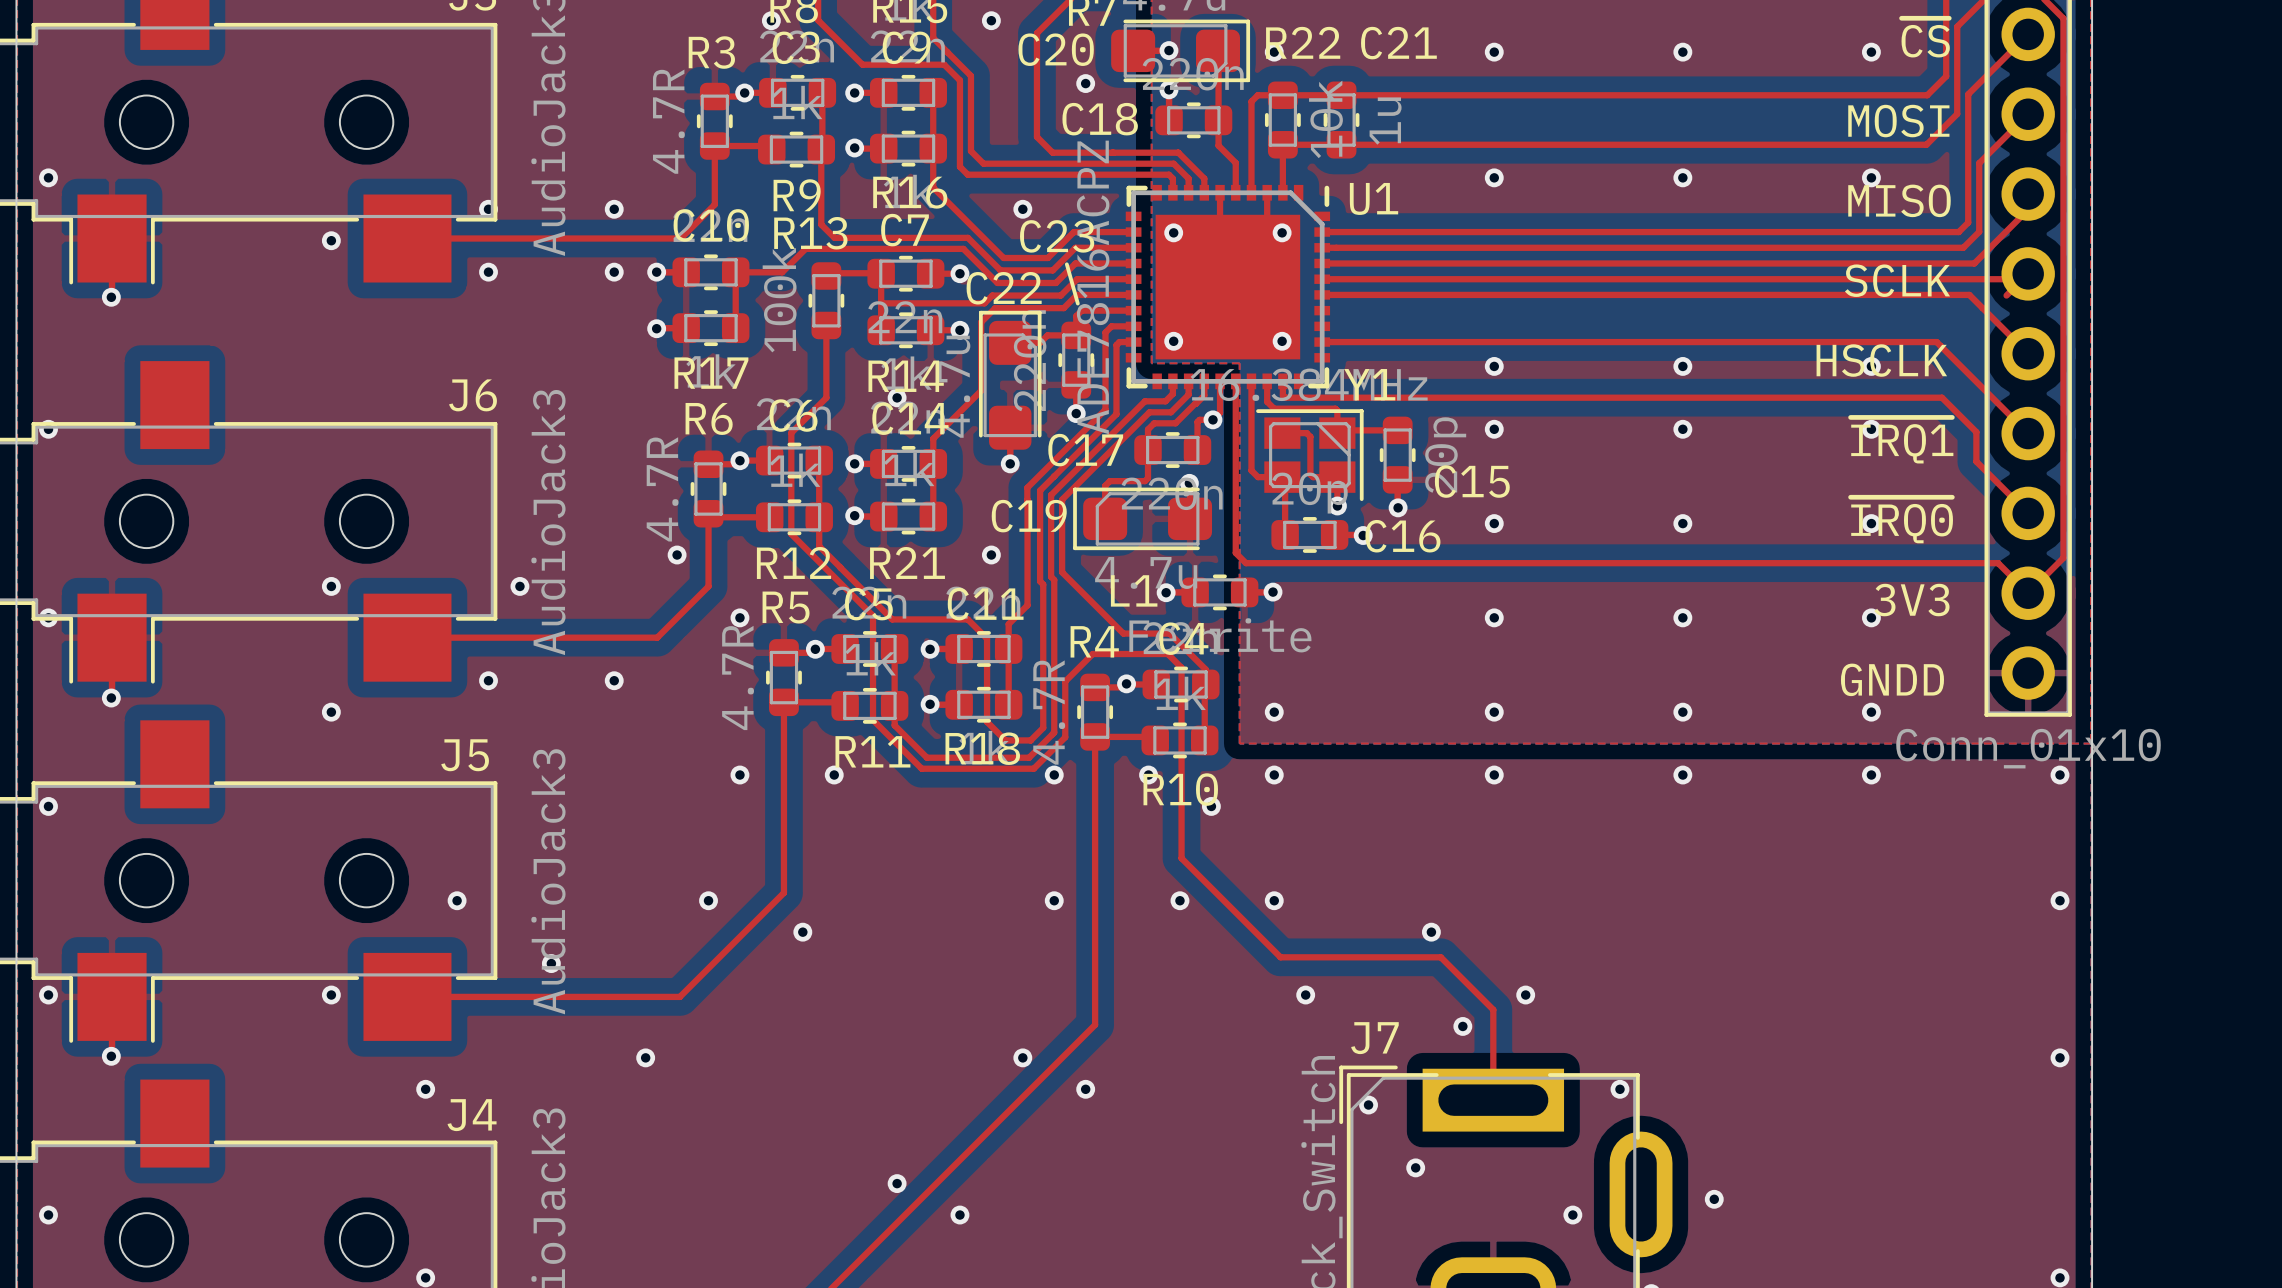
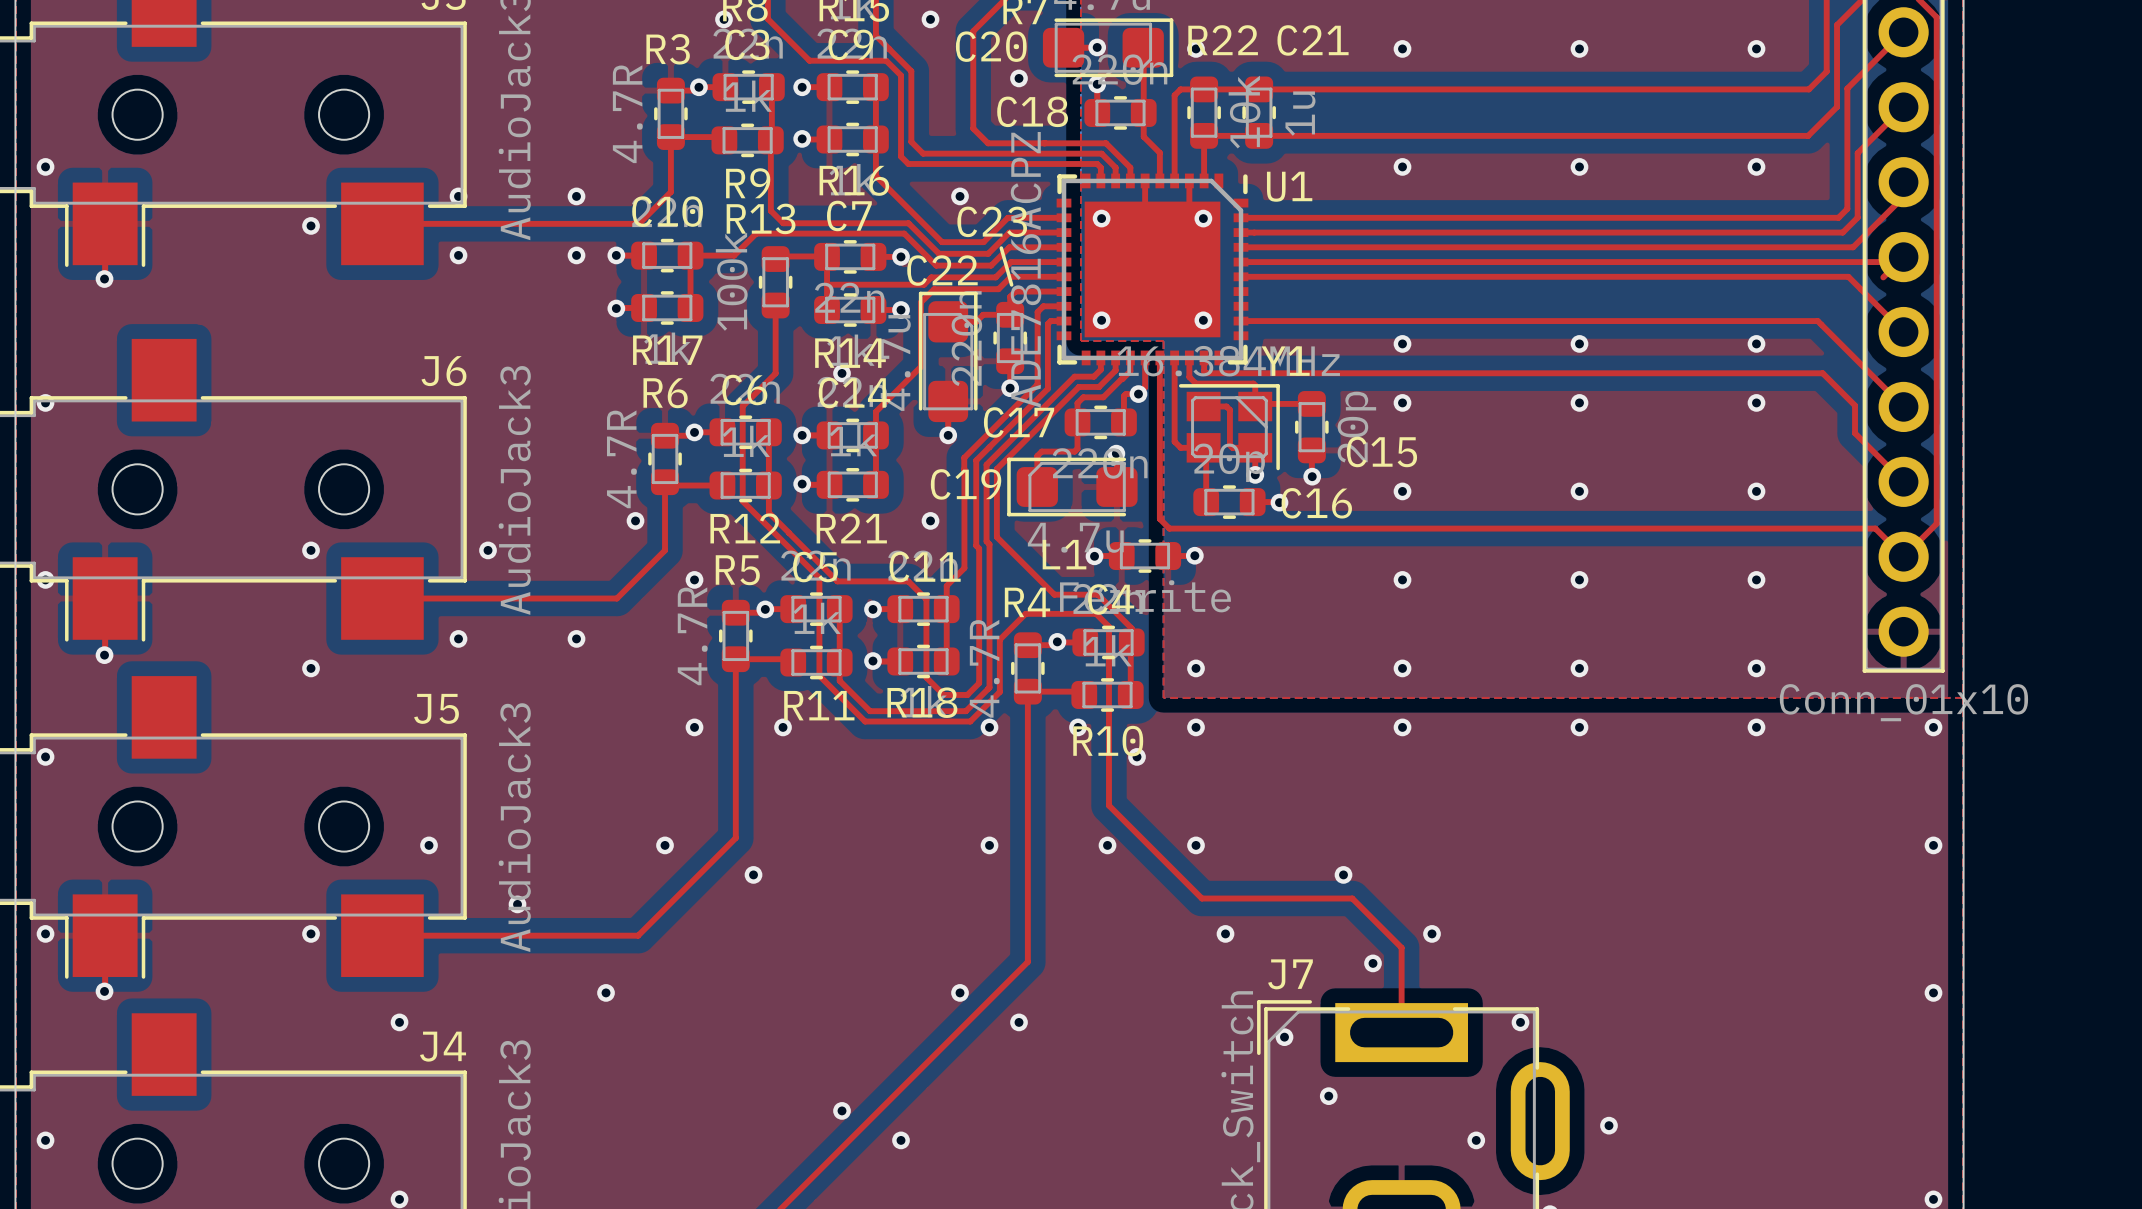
text: ~{CS} (1925, 37) -> none
text: MOSI (1898, 121) -> none
text: MISO (1899, 200) -> none
text: SCLK (1897, 280) -> none
text: HSCLK (1881, 360) -> none
text: ~{IRQ1} (1901, 440) -> none
text: ~{IRQ0} (1901, 520) -> none
text: 3V3 (1911, 600) -> none
text: GNDD (1892, 679) -> none

